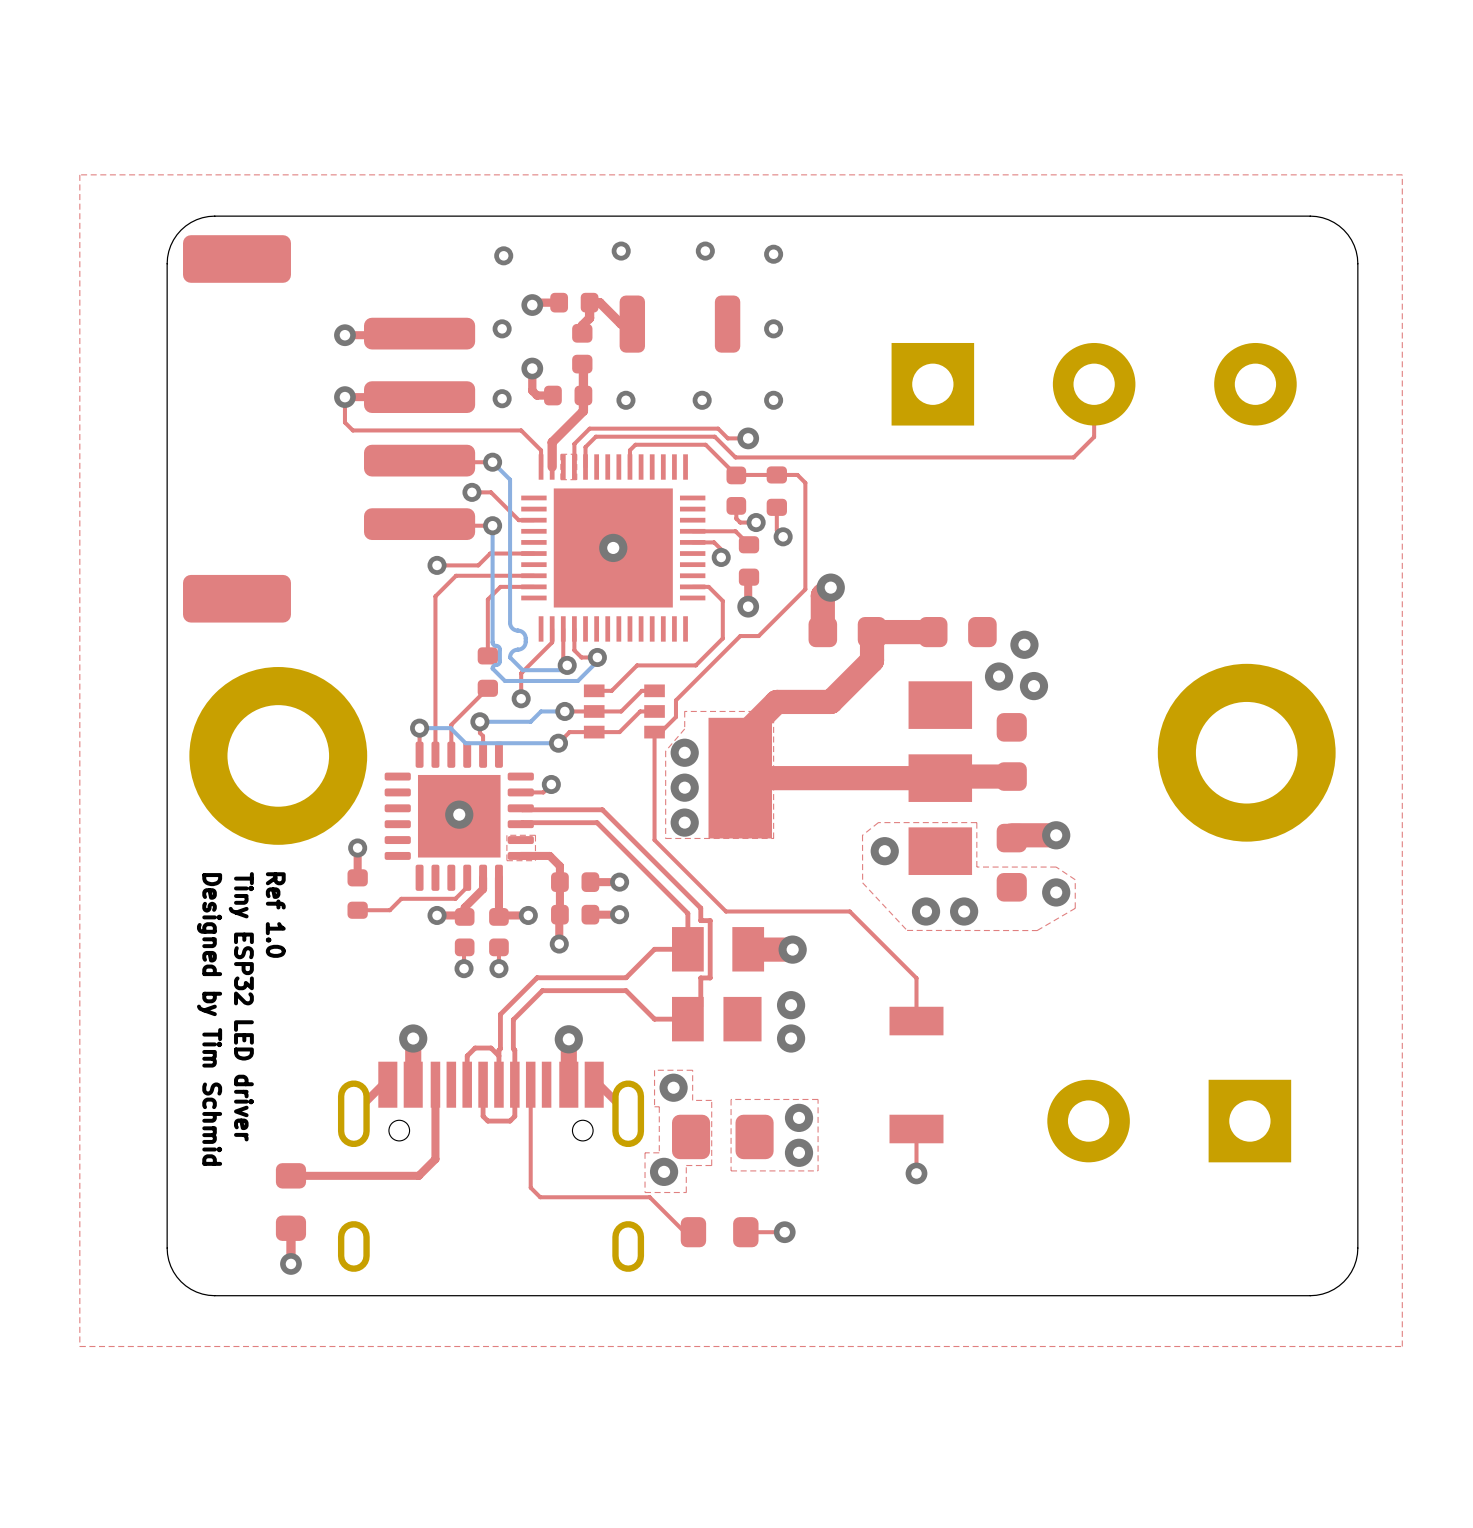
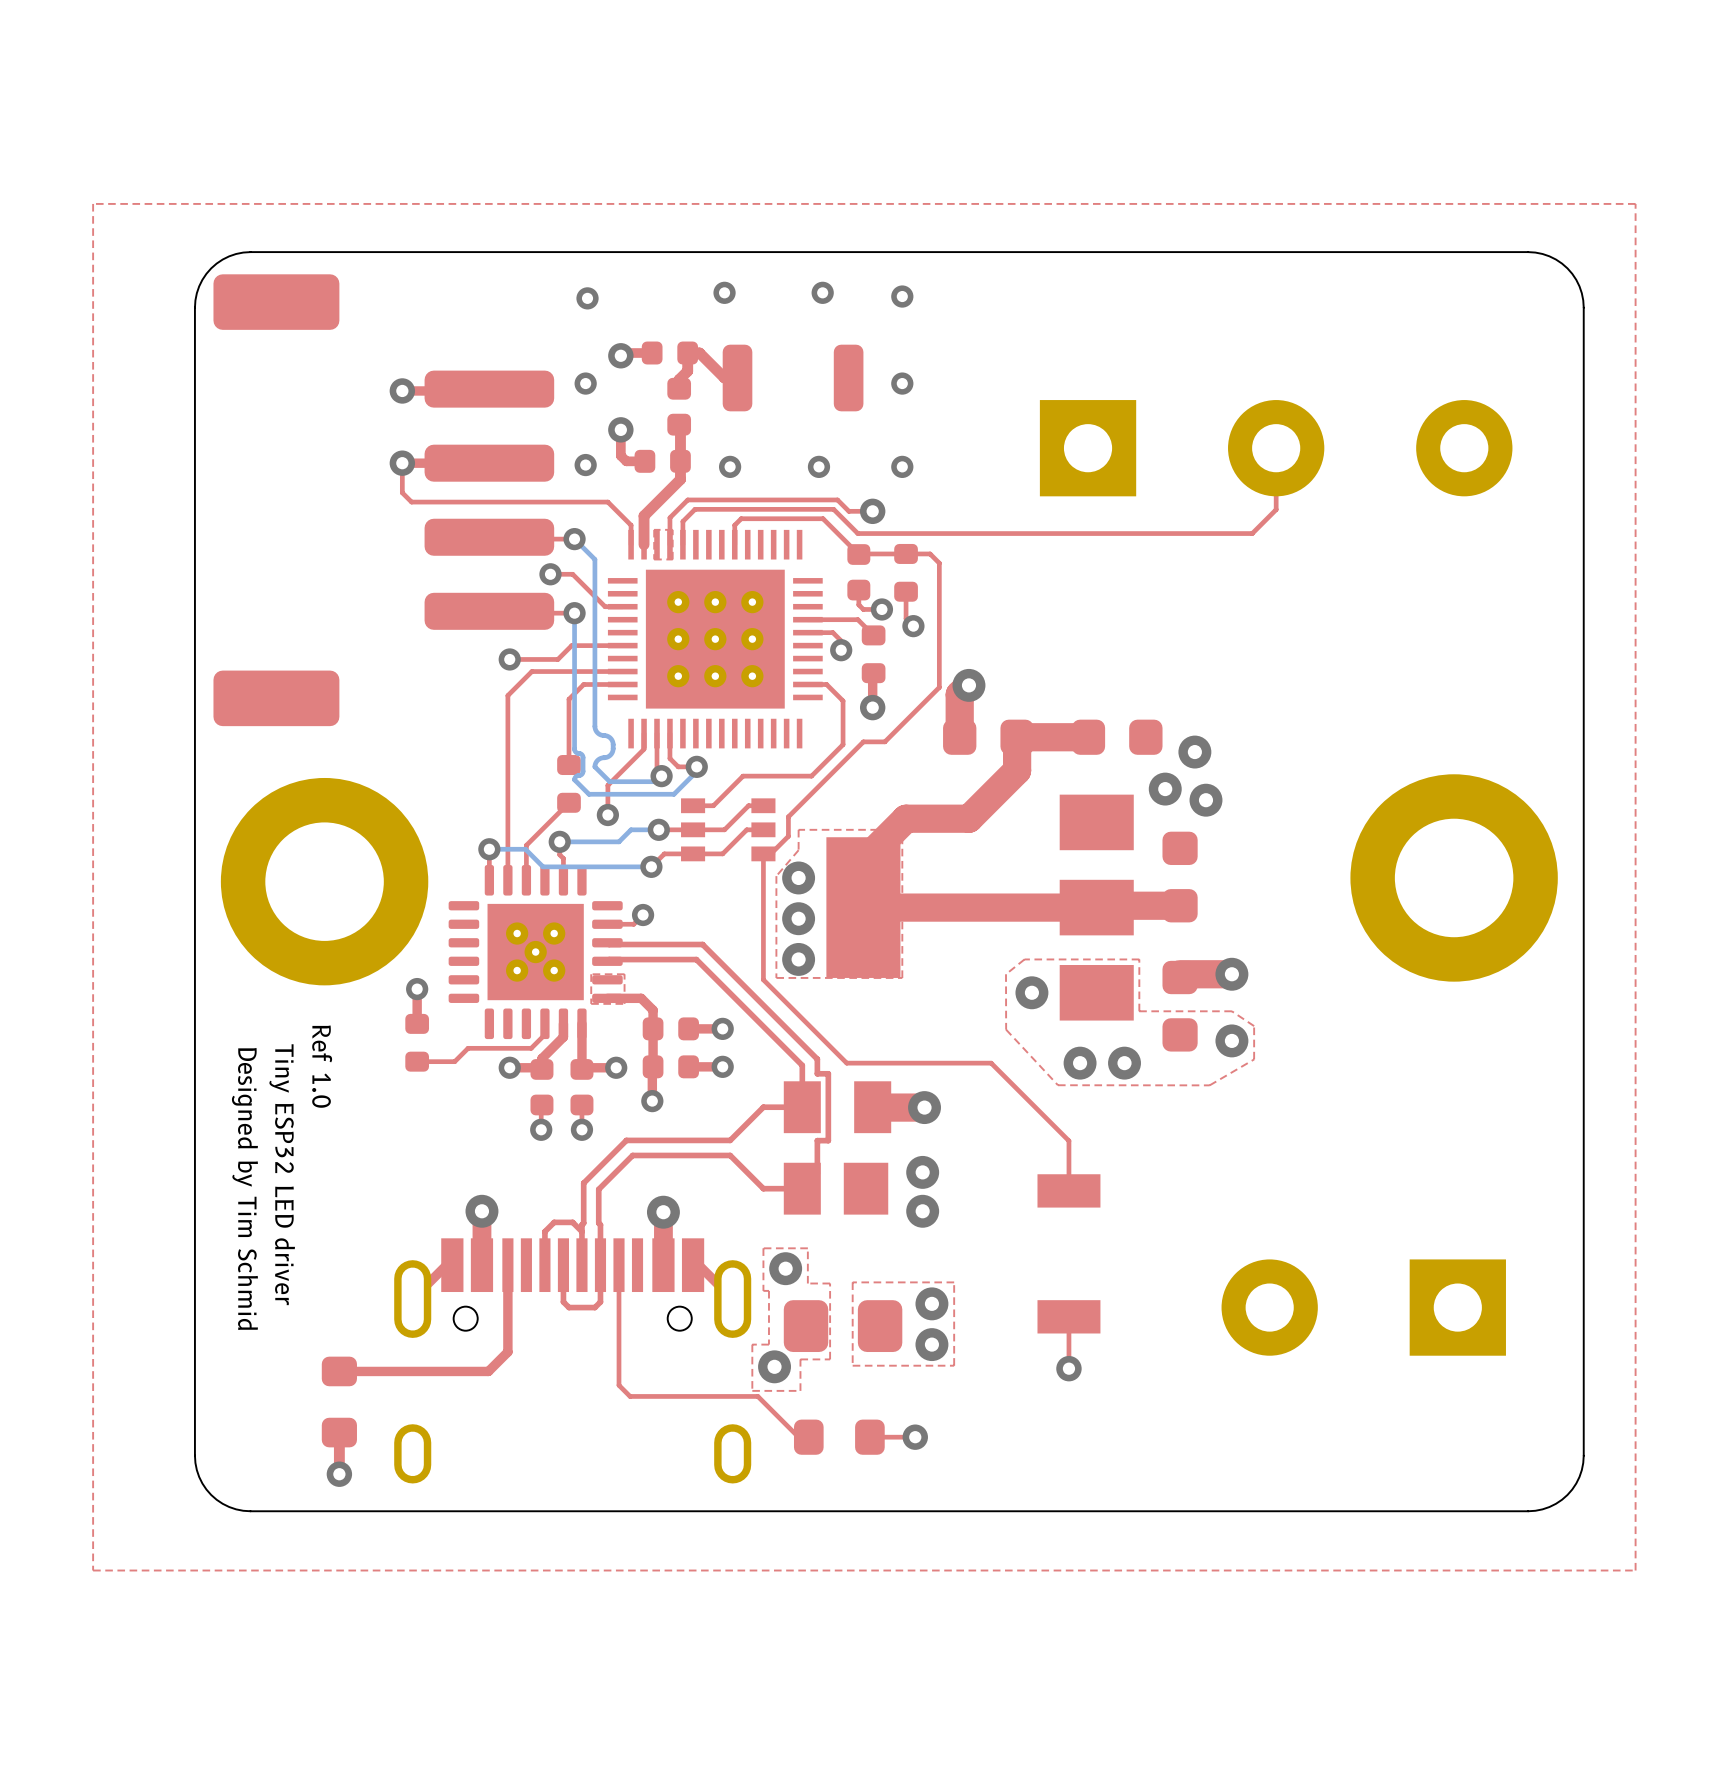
part footprint: [521, 454, 706, 642] -> [607, 529, 823, 749]
via: (613, 547) -> none
part footprint: [384, 741, 534, 891] -> [448, 865, 623, 1040]
via: (459, 814) -> none

